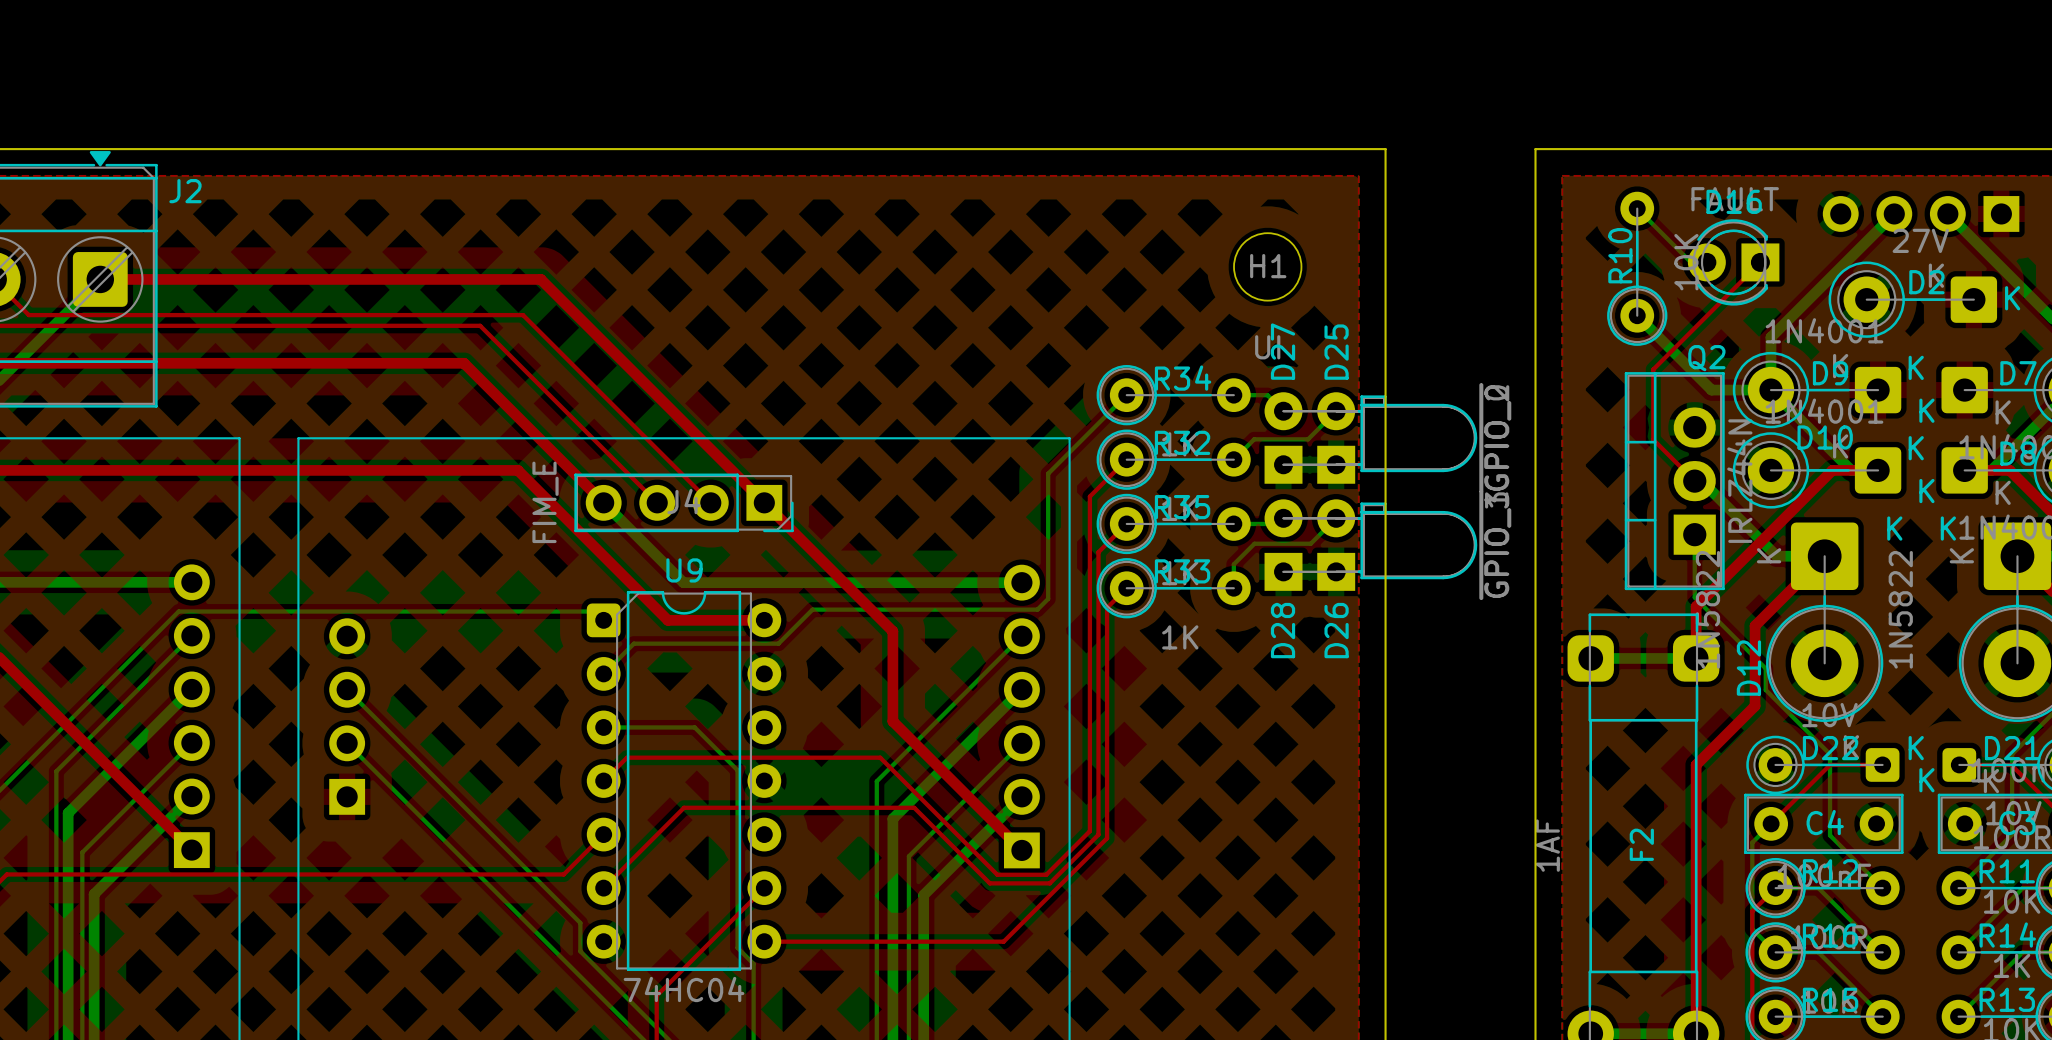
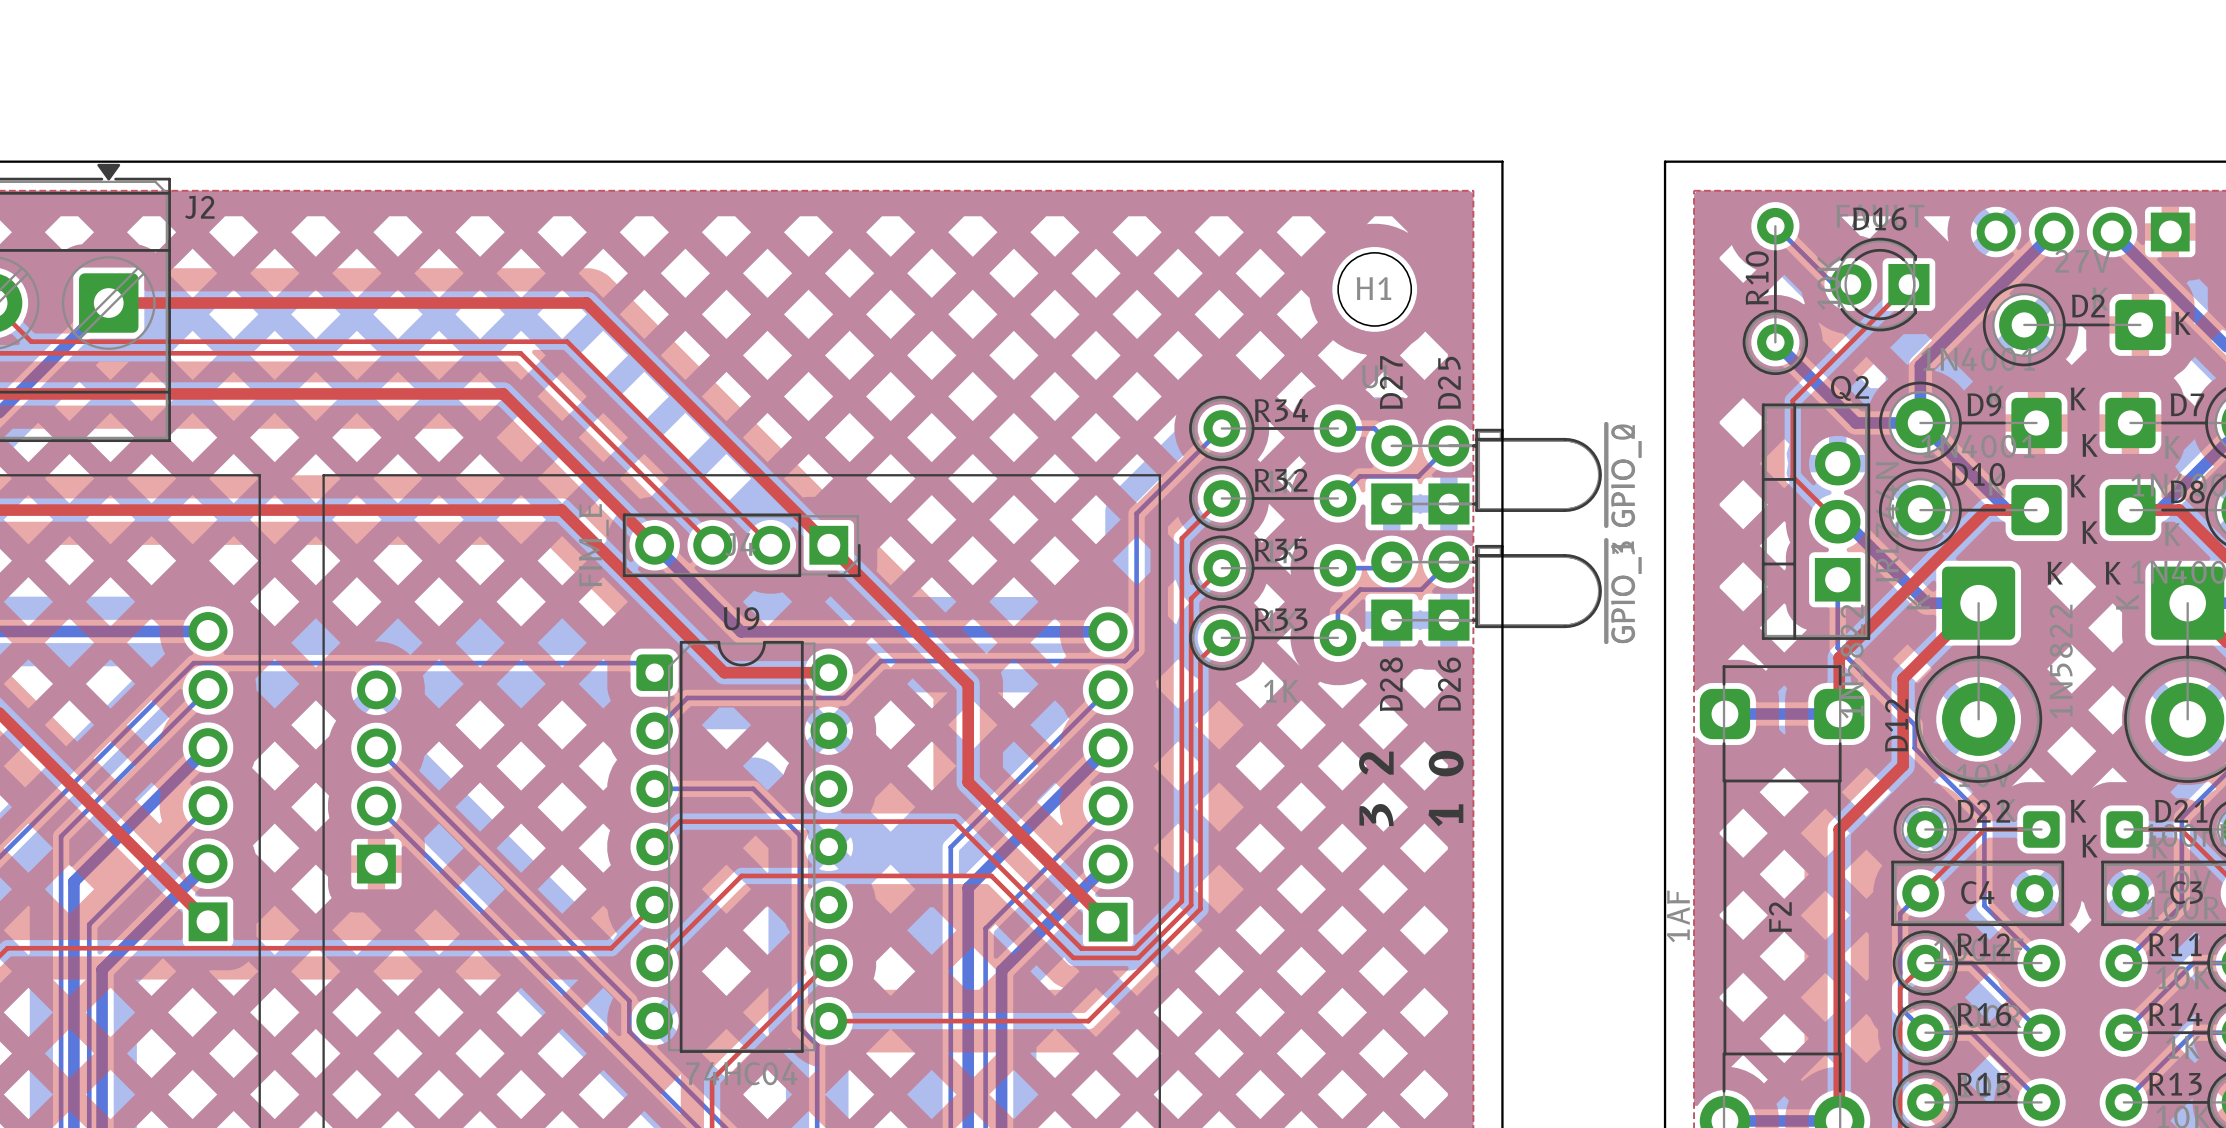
text: none -> 2 (1376, 763)
text: none -> 0 (1446, 763)
text: none -> 1 (1445, 815)
text: none -> 3 (1376, 815)

